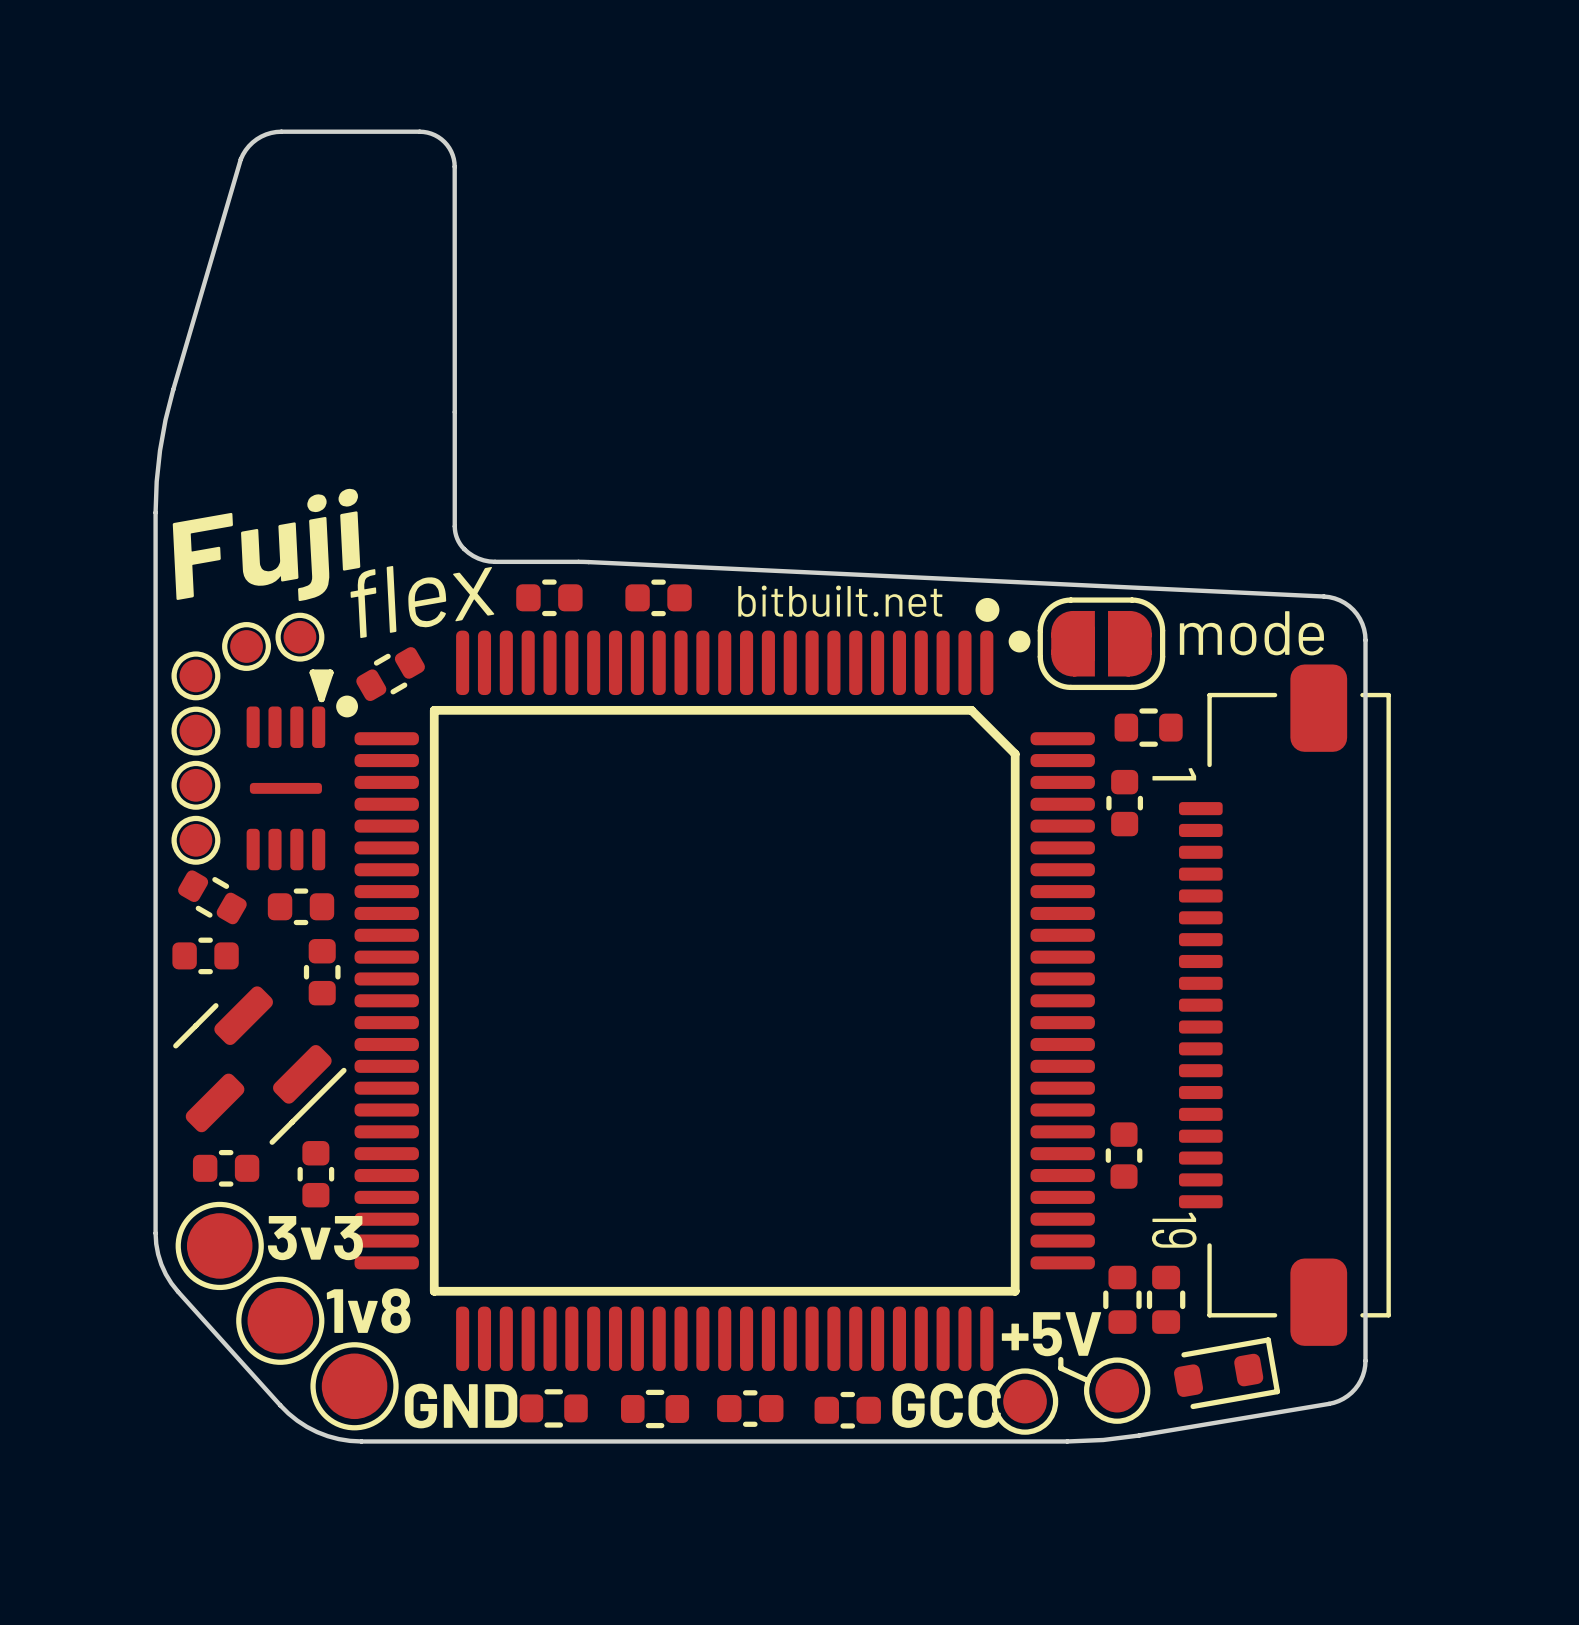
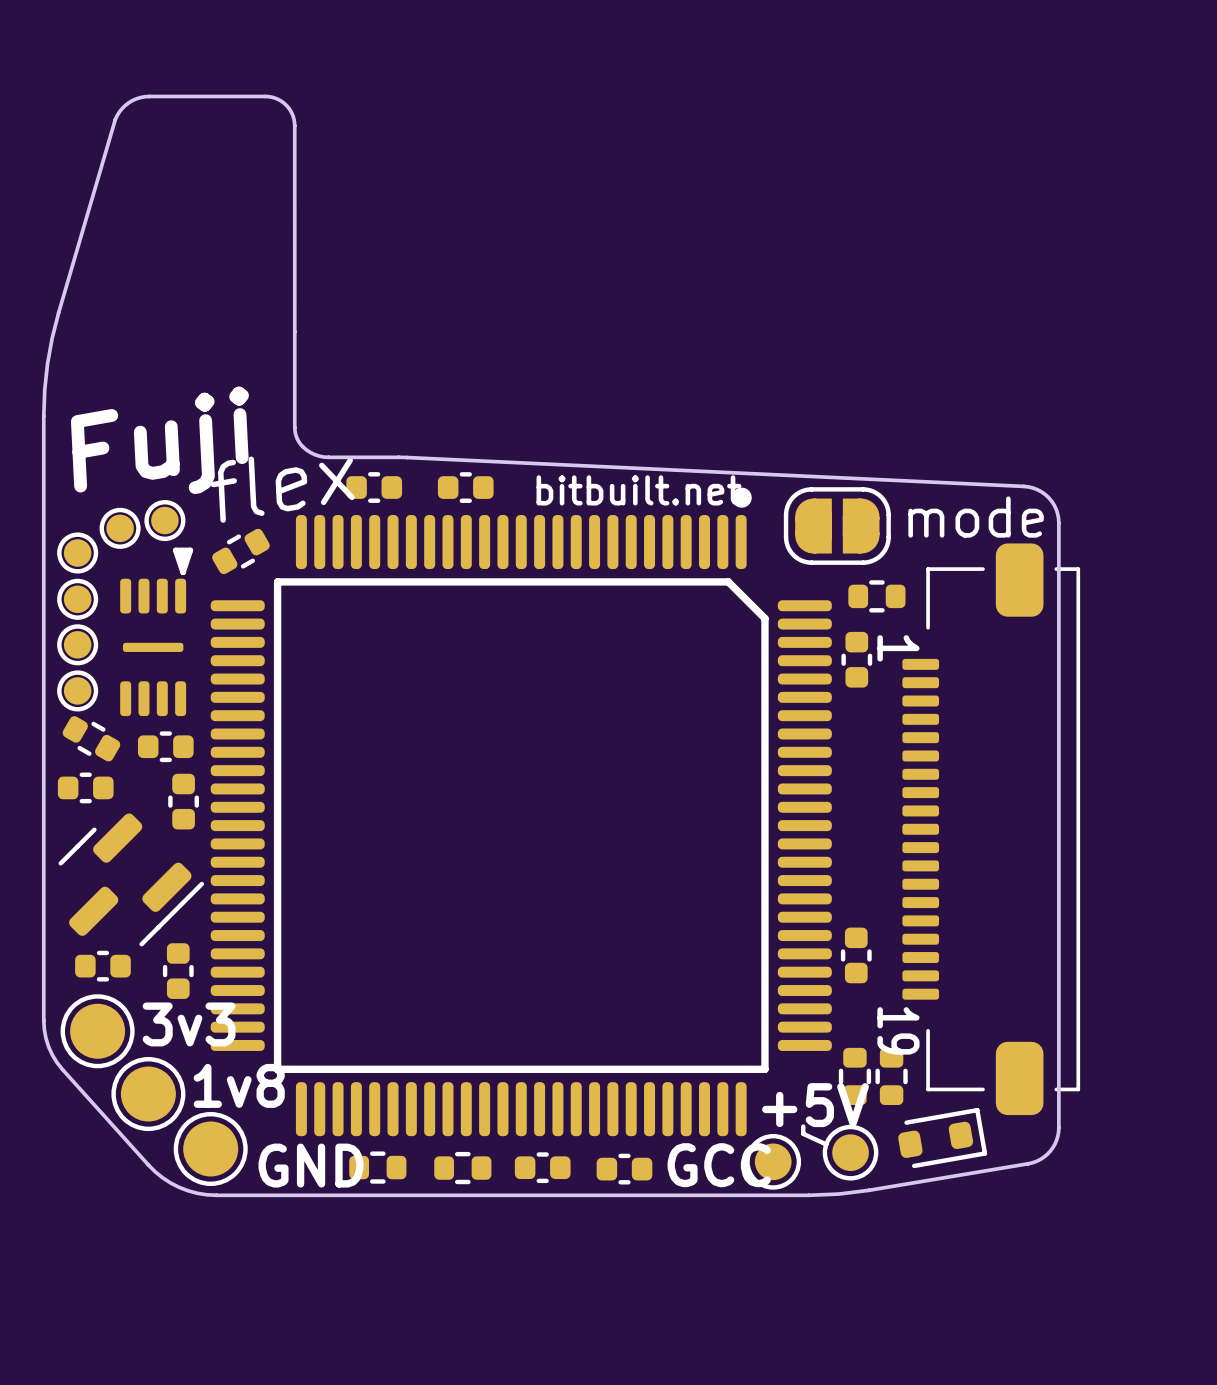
part footprint: [354, 630, 1095, 1372] -> [210, 515, 832, 1137]
part footprint: [246, 695, 359, 871] -> [120, 578, 187, 717]

